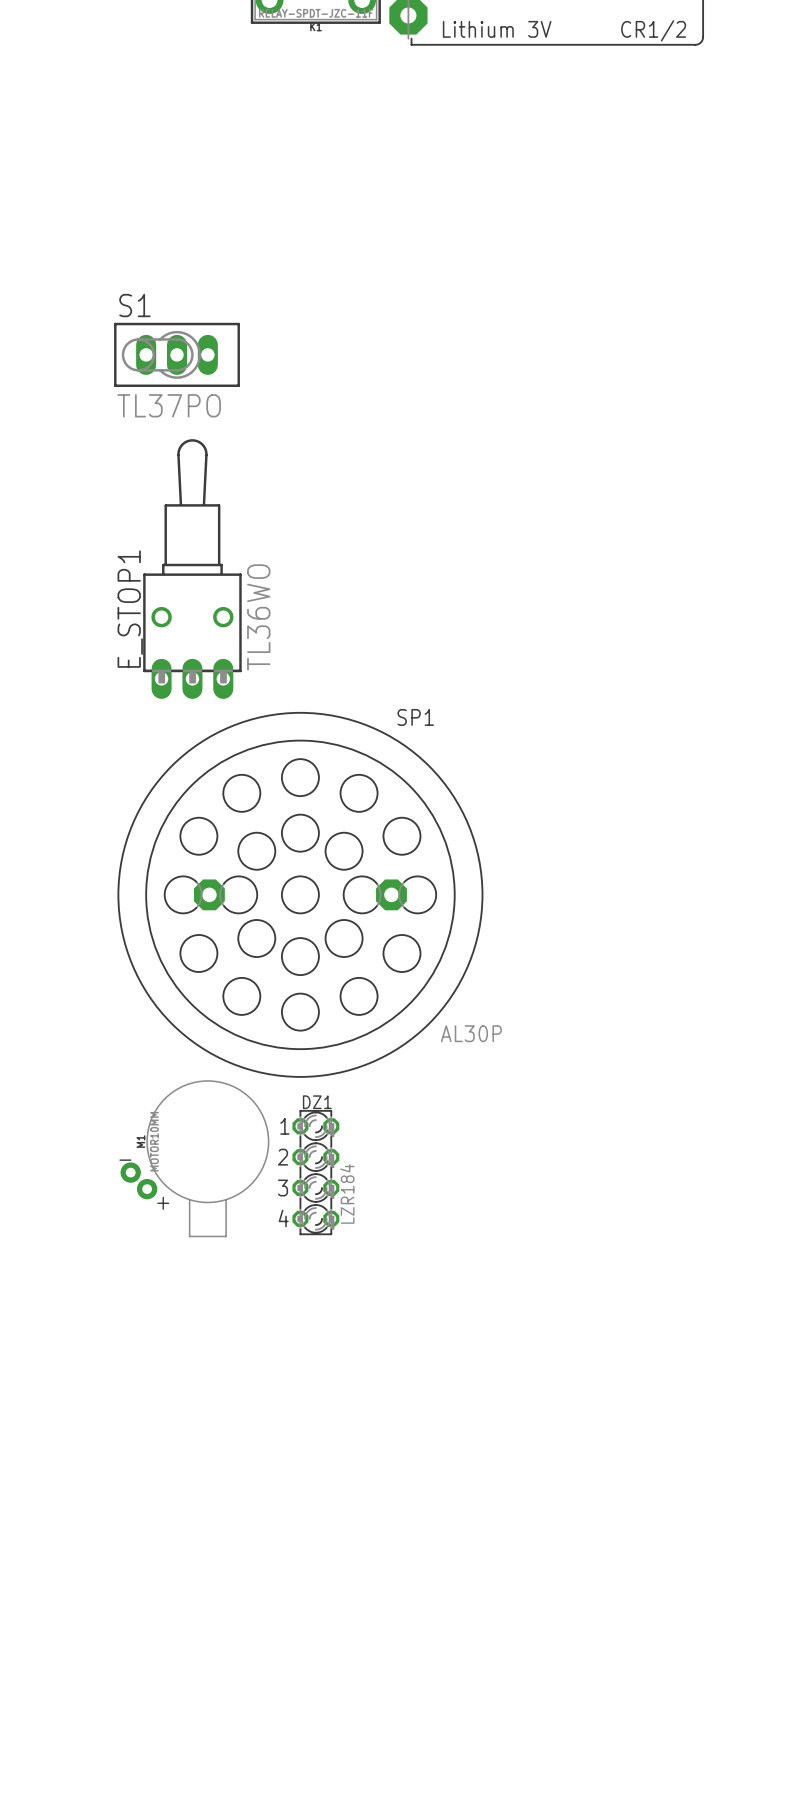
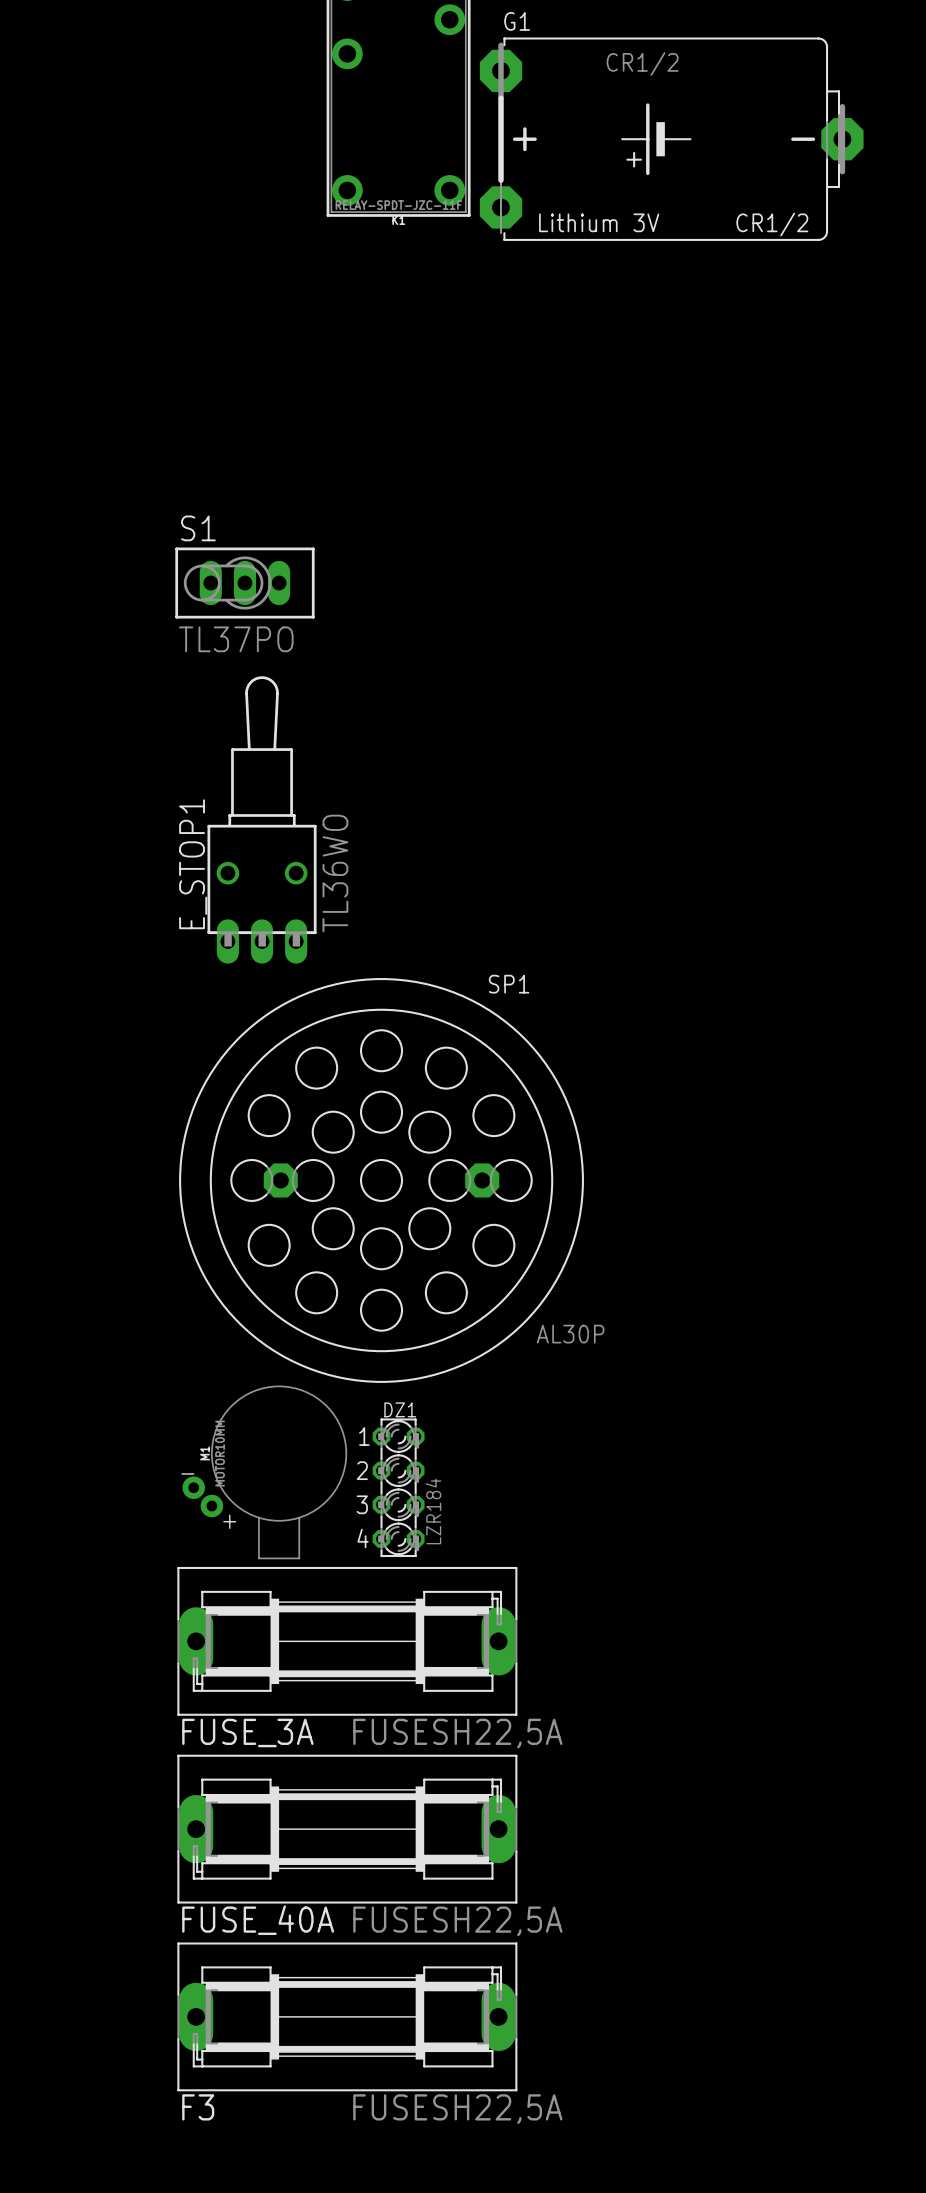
FUSE_3A: none -> FUSESH22,5A (347, 1641)
FUSE_40A: none -> FUSESH22,5A (347, 1829)
F3: none -> FUSESH22,5A (347, 2016)

